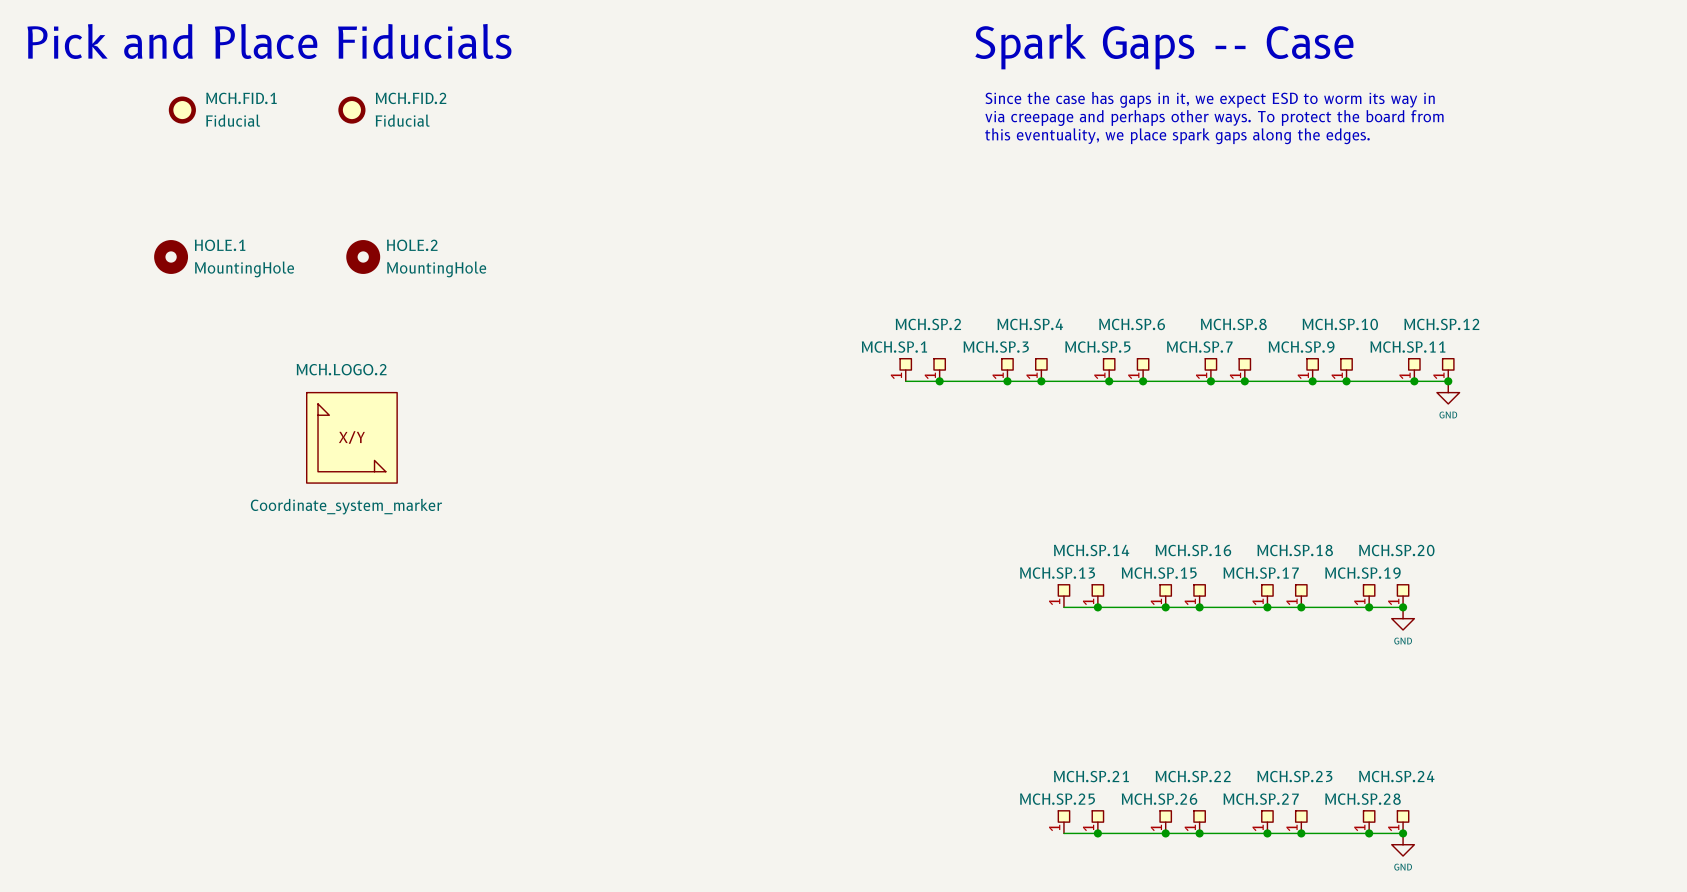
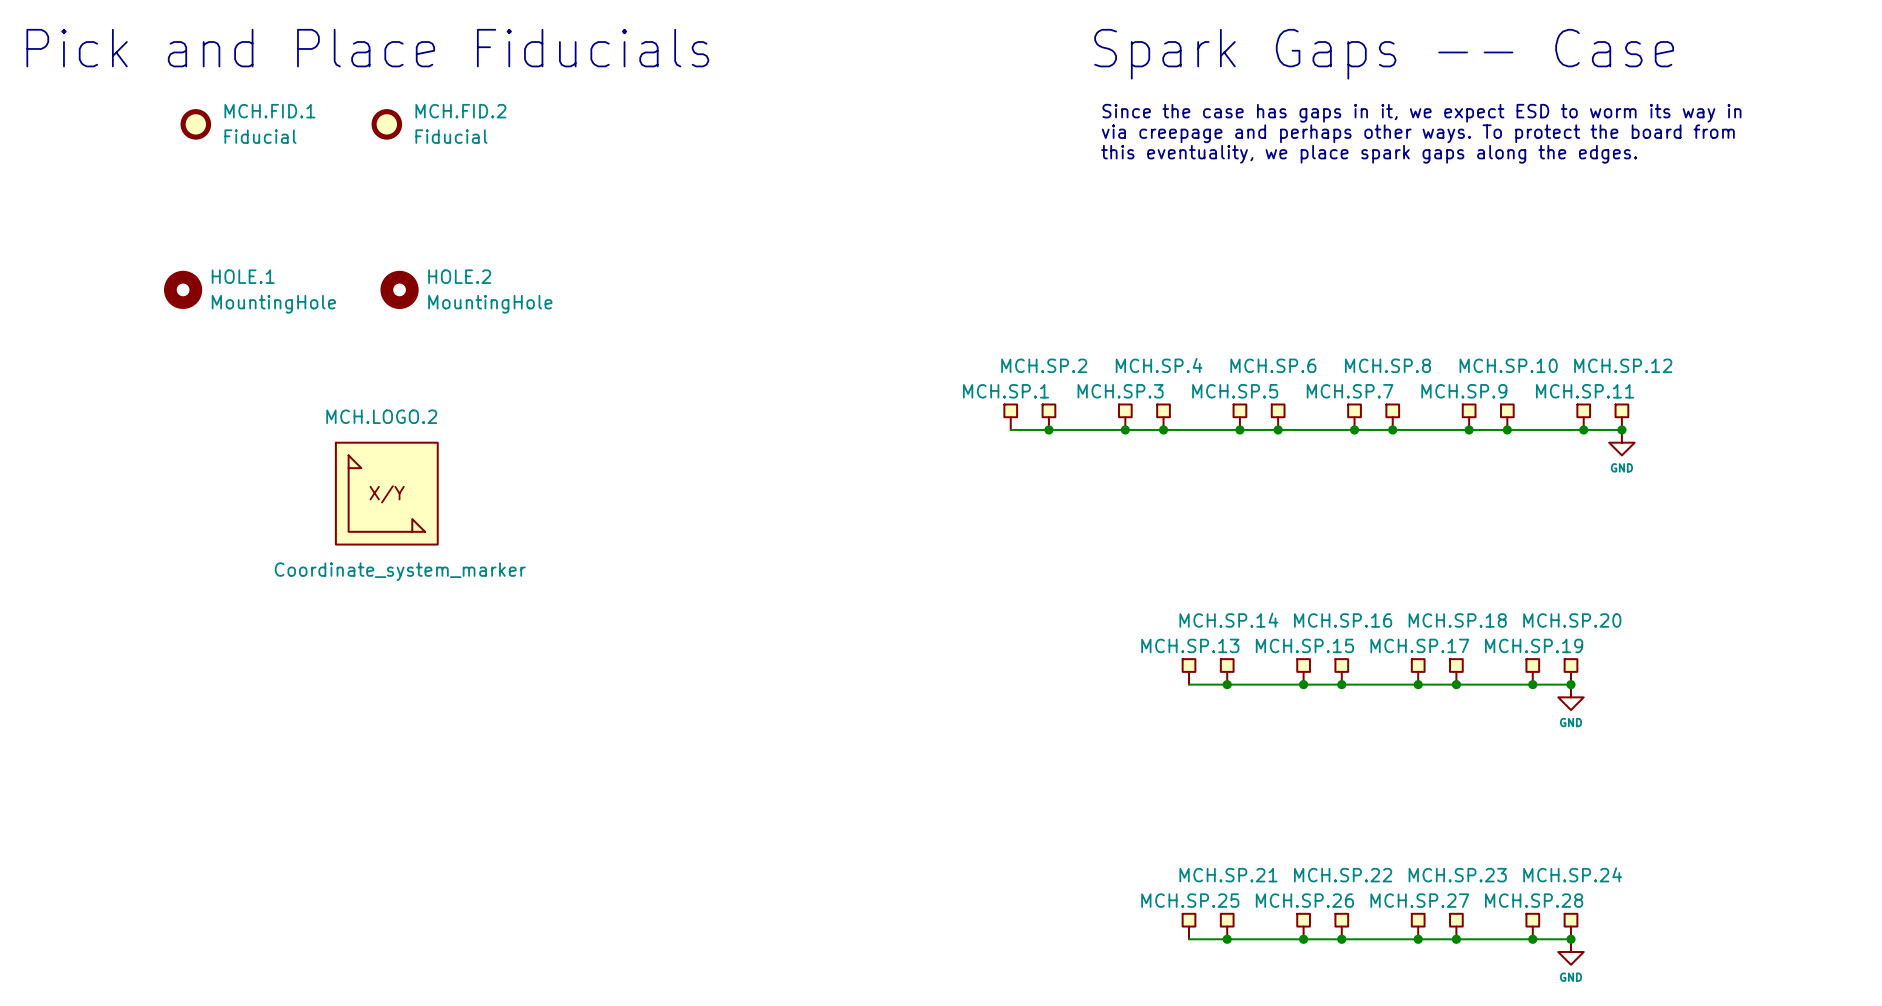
MCH.SP.1 pin number: 1 (896, 375) -> none
MCH.SP.2 pin number: 1 (930, 375) -> none
MCH.SP.3 pin number: 1 (998, 375) -> none
MCH.SP.4 pin number: 1 (1032, 375) -> none
MCH.SP.5 pin number: 1 (1099, 375) -> none
MCH.SP.6 pin number: 1 (1133, 375) -> none
MCH.SP.7 pin number: 1 (1201, 375) -> none
MCH.SP.8 pin number: 1 (1235, 375) -> none
MCH.SP.9 pin number: 1 (1303, 375) -> none
MCH.SP.10 pin number: 1 (1337, 375) -> none
MCH.SP.11 pin number: 1 (1405, 375) -> none
MCH.SP.12 pin number: 1 (1438, 375) -> none
MCH.SP.13 pin number: 1 (1054, 601) -> none
MCH.SP.14 pin number: 1 (1088, 601) -> none
MCH.SP.15 pin number: 1 (1156, 601) -> none
MCH.SP.16 pin number: 1 (1190, 601) -> none
MCH.SP.17 pin number: 1 (1258, 601) -> none
MCH.SP.18 pin number: 1 (1292, 601) -> none
MCH.SP.19 pin number: 1 (1359, 601) -> none
MCH.SP.20 pin number: 1 (1393, 601) -> none
MCH.SP.25 pin number: 1 (1054, 827) -> none
MCH.SP.21 pin number: 1 (1088, 827) -> none
MCH.SP.26 pin number: 1 (1156, 827) -> none
MCH.SP.22 pin number: 1 (1190, 827) -> none
MCH.SP.27 pin number: 1 (1258, 827) -> none
MCH.SP.23 pin number: 1 (1292, 827) -> none
MCH.SP.28 pin number: 1 (1359, 827) -> none
MCH.SP.24 pin number: 1 (1393, 827) -> none

